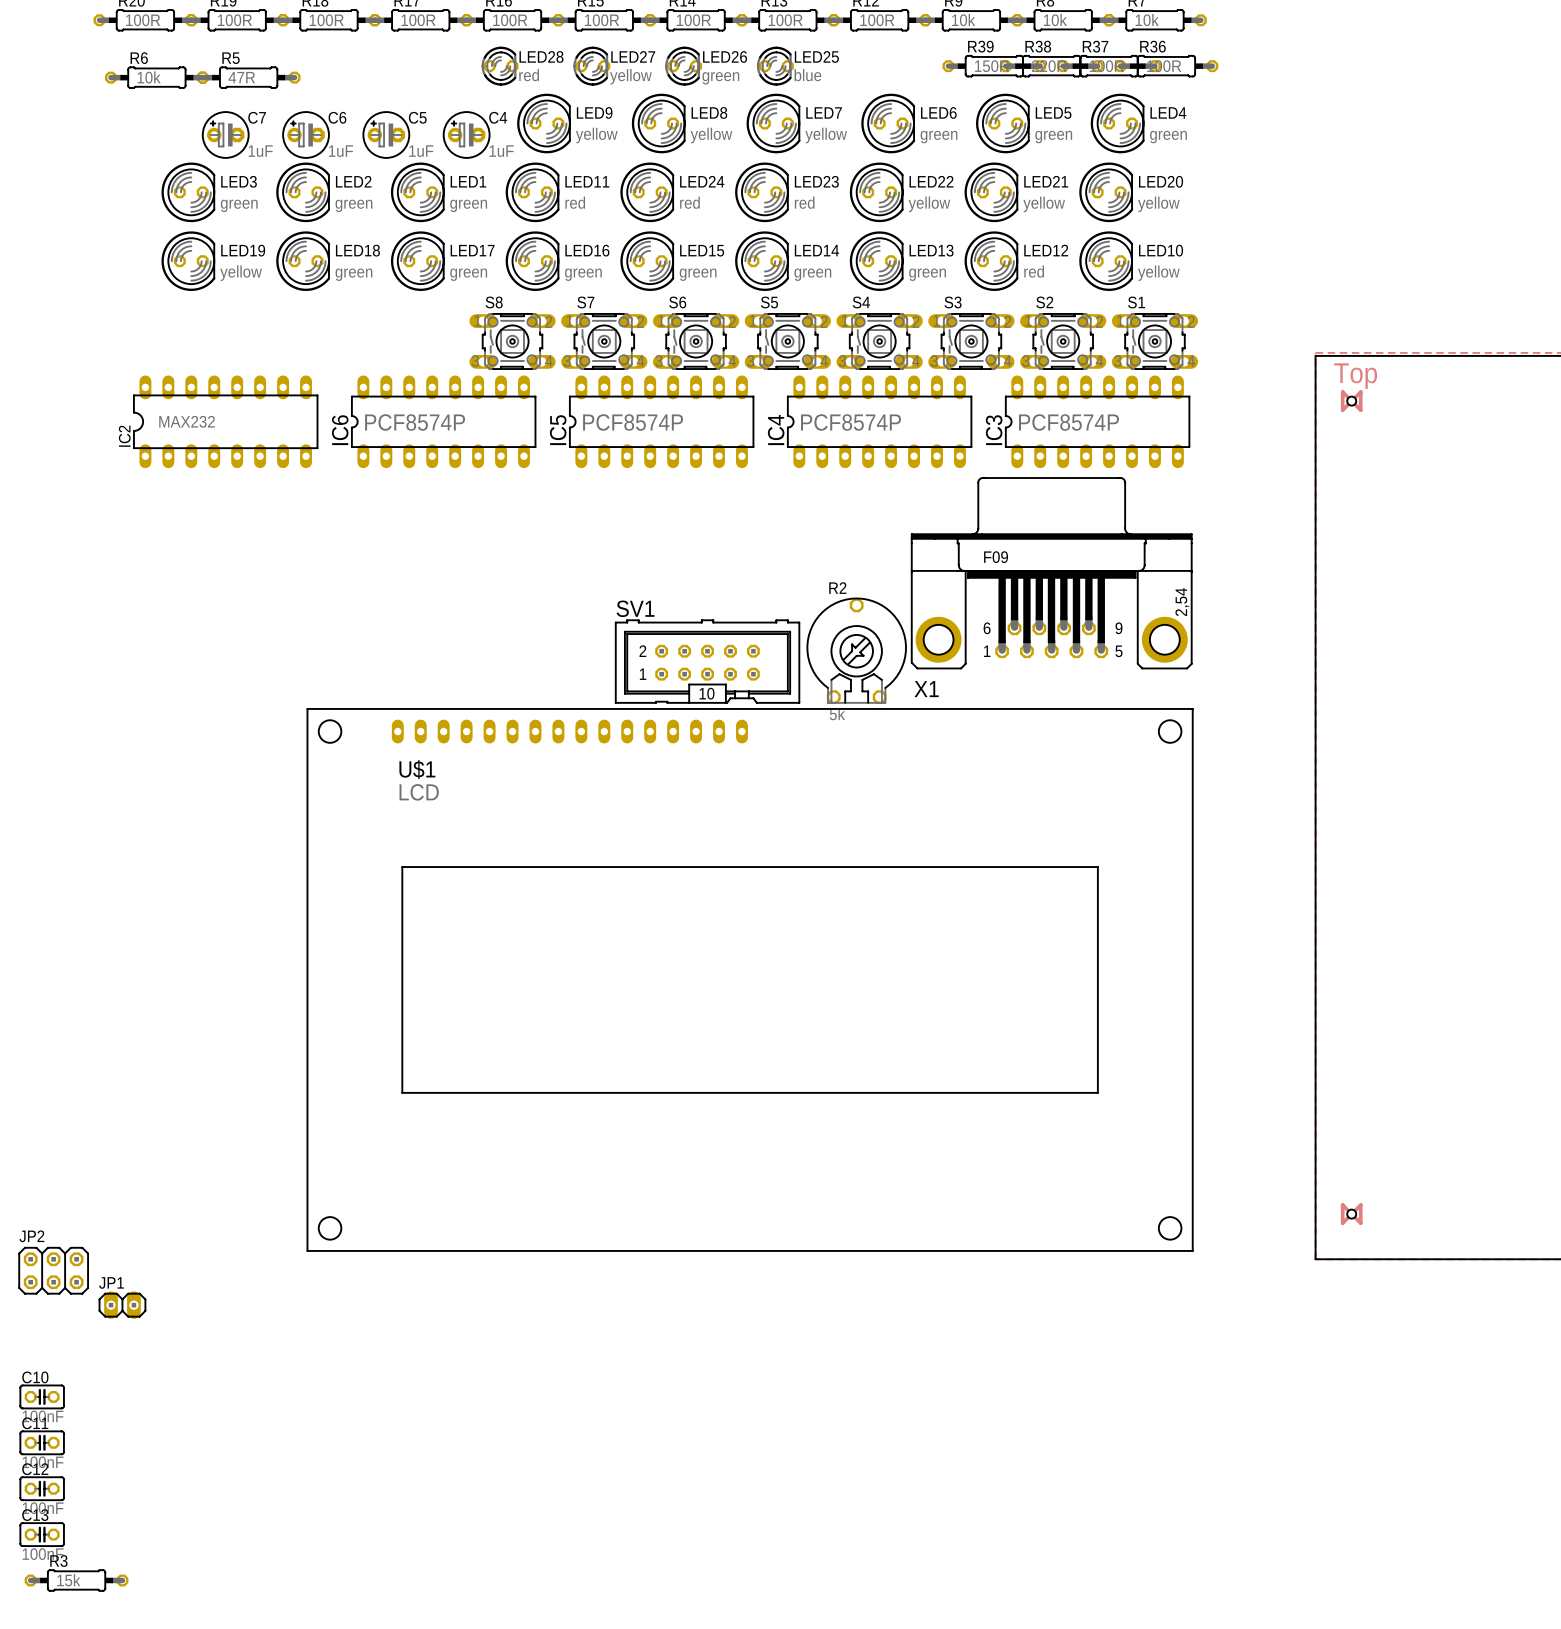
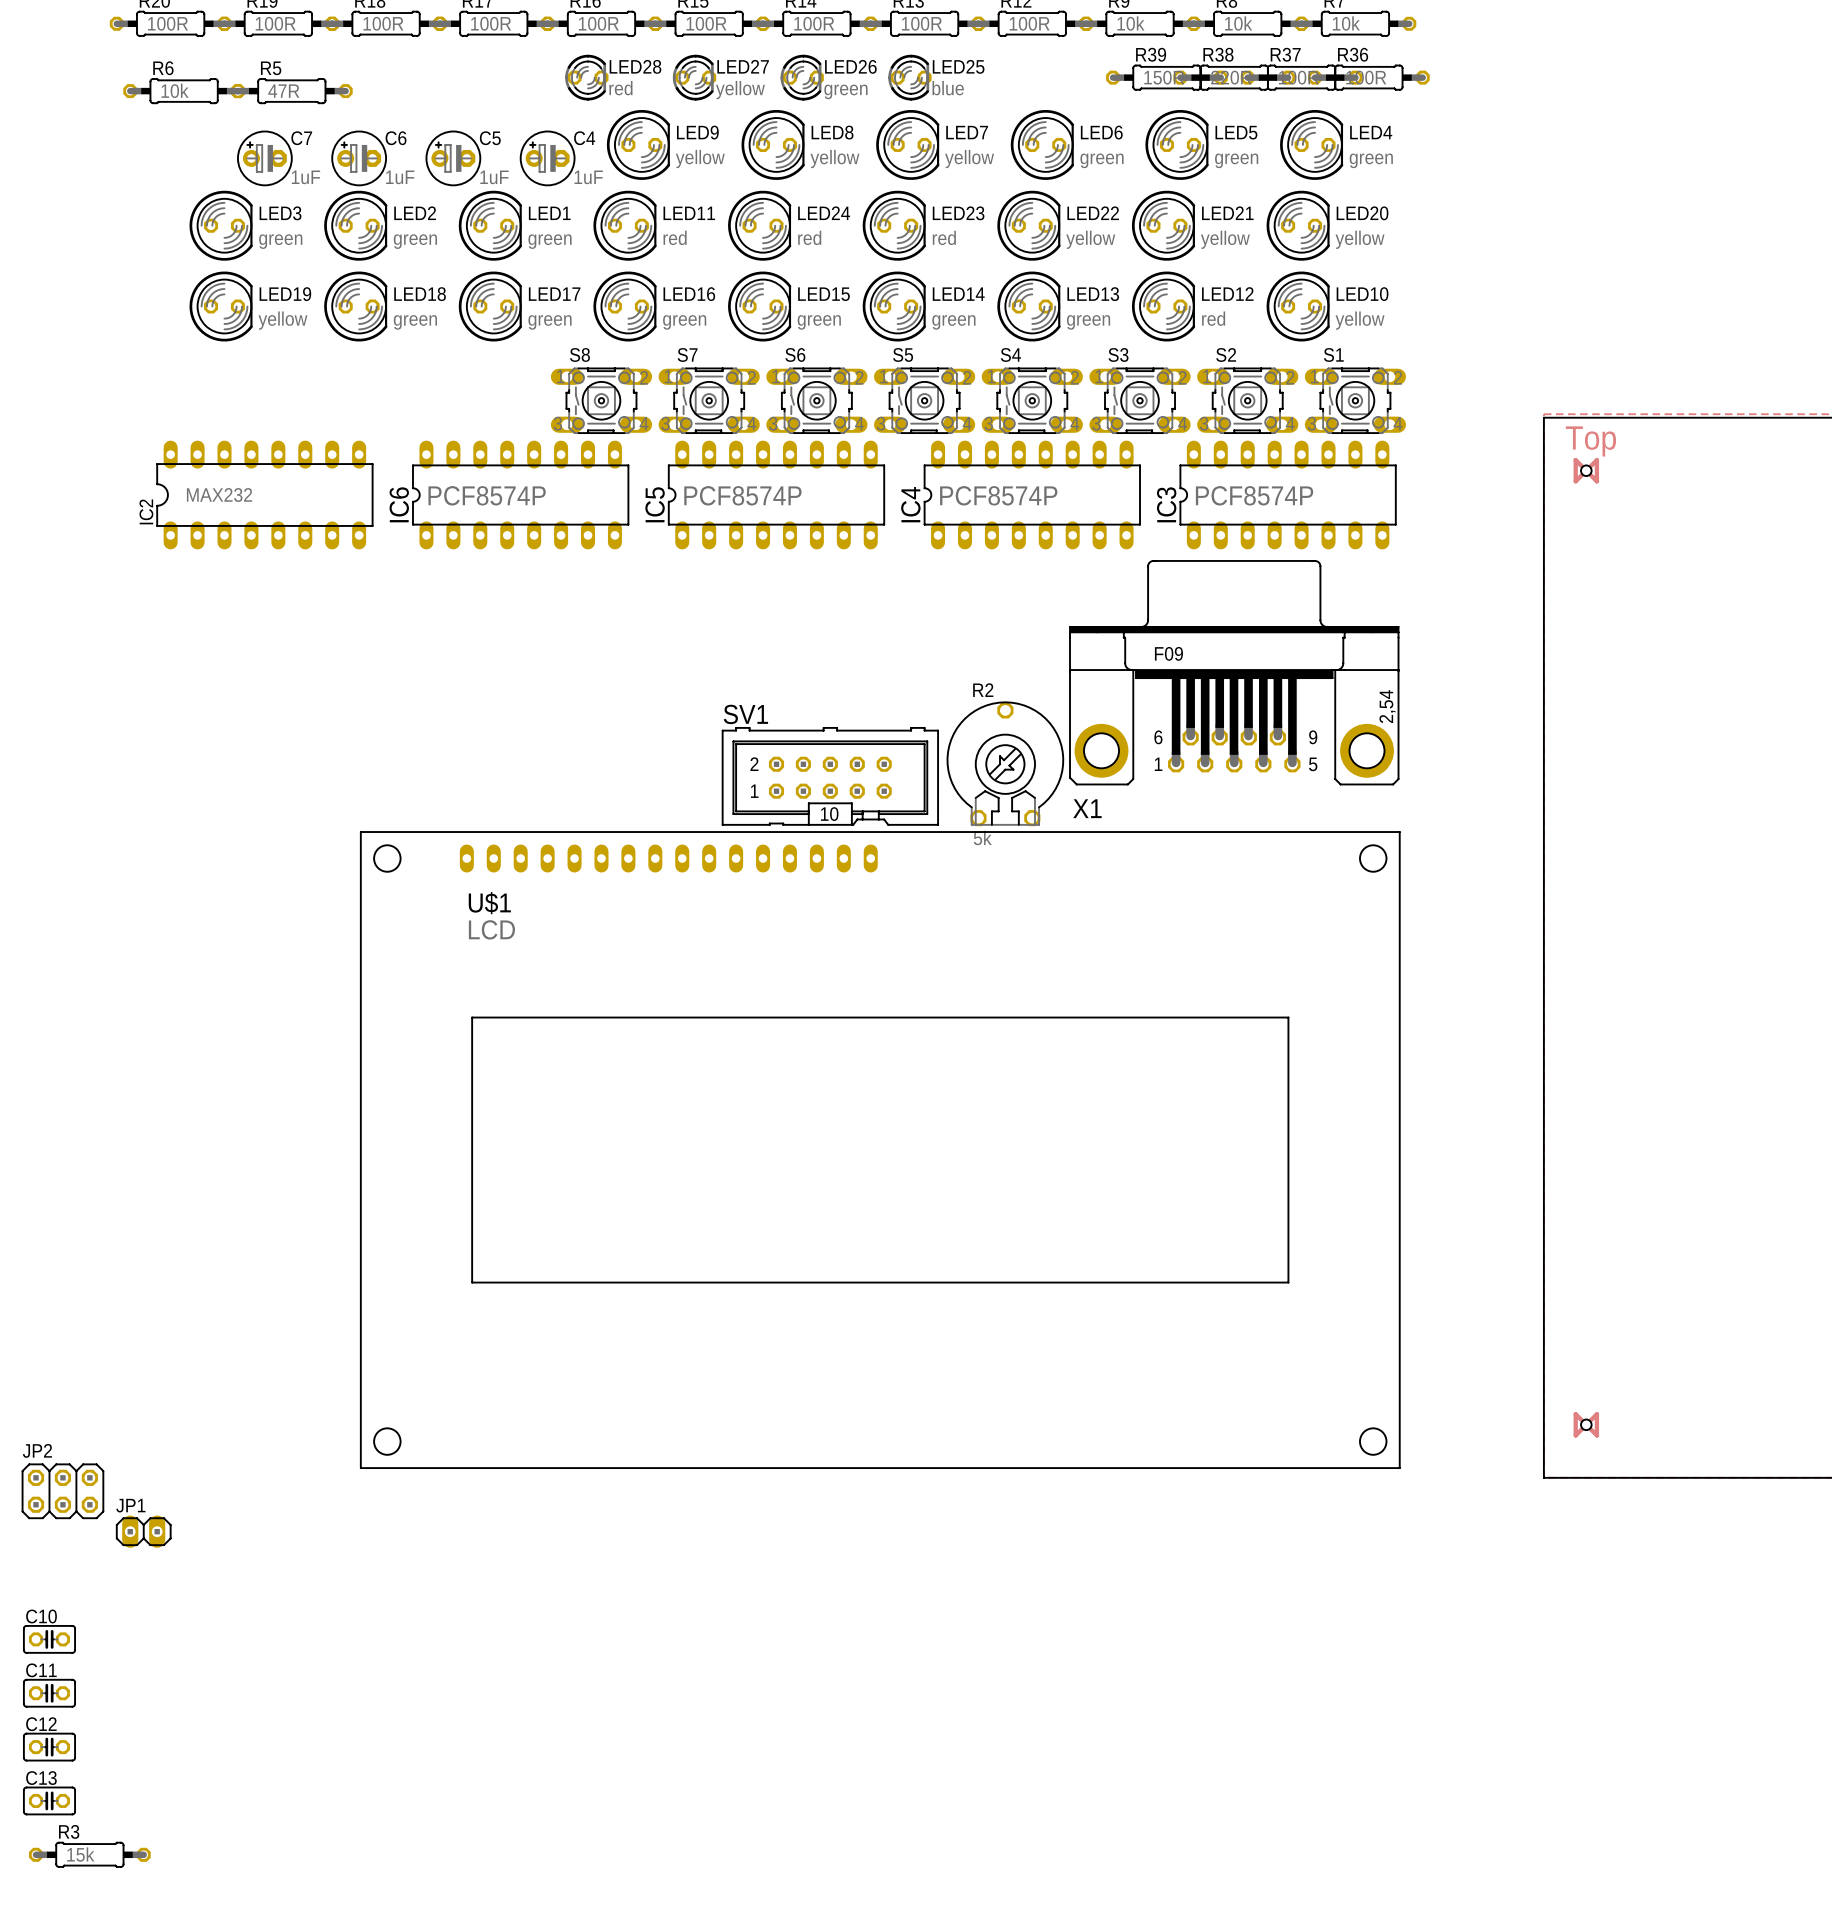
C10 value: 100nF (43, 1416) -> none
C11 value: 100nF (43, 1462) -> none
C12 value: 100nF (43, 1508) -> none
C13 value: 100nF (43, 1554) -> none

